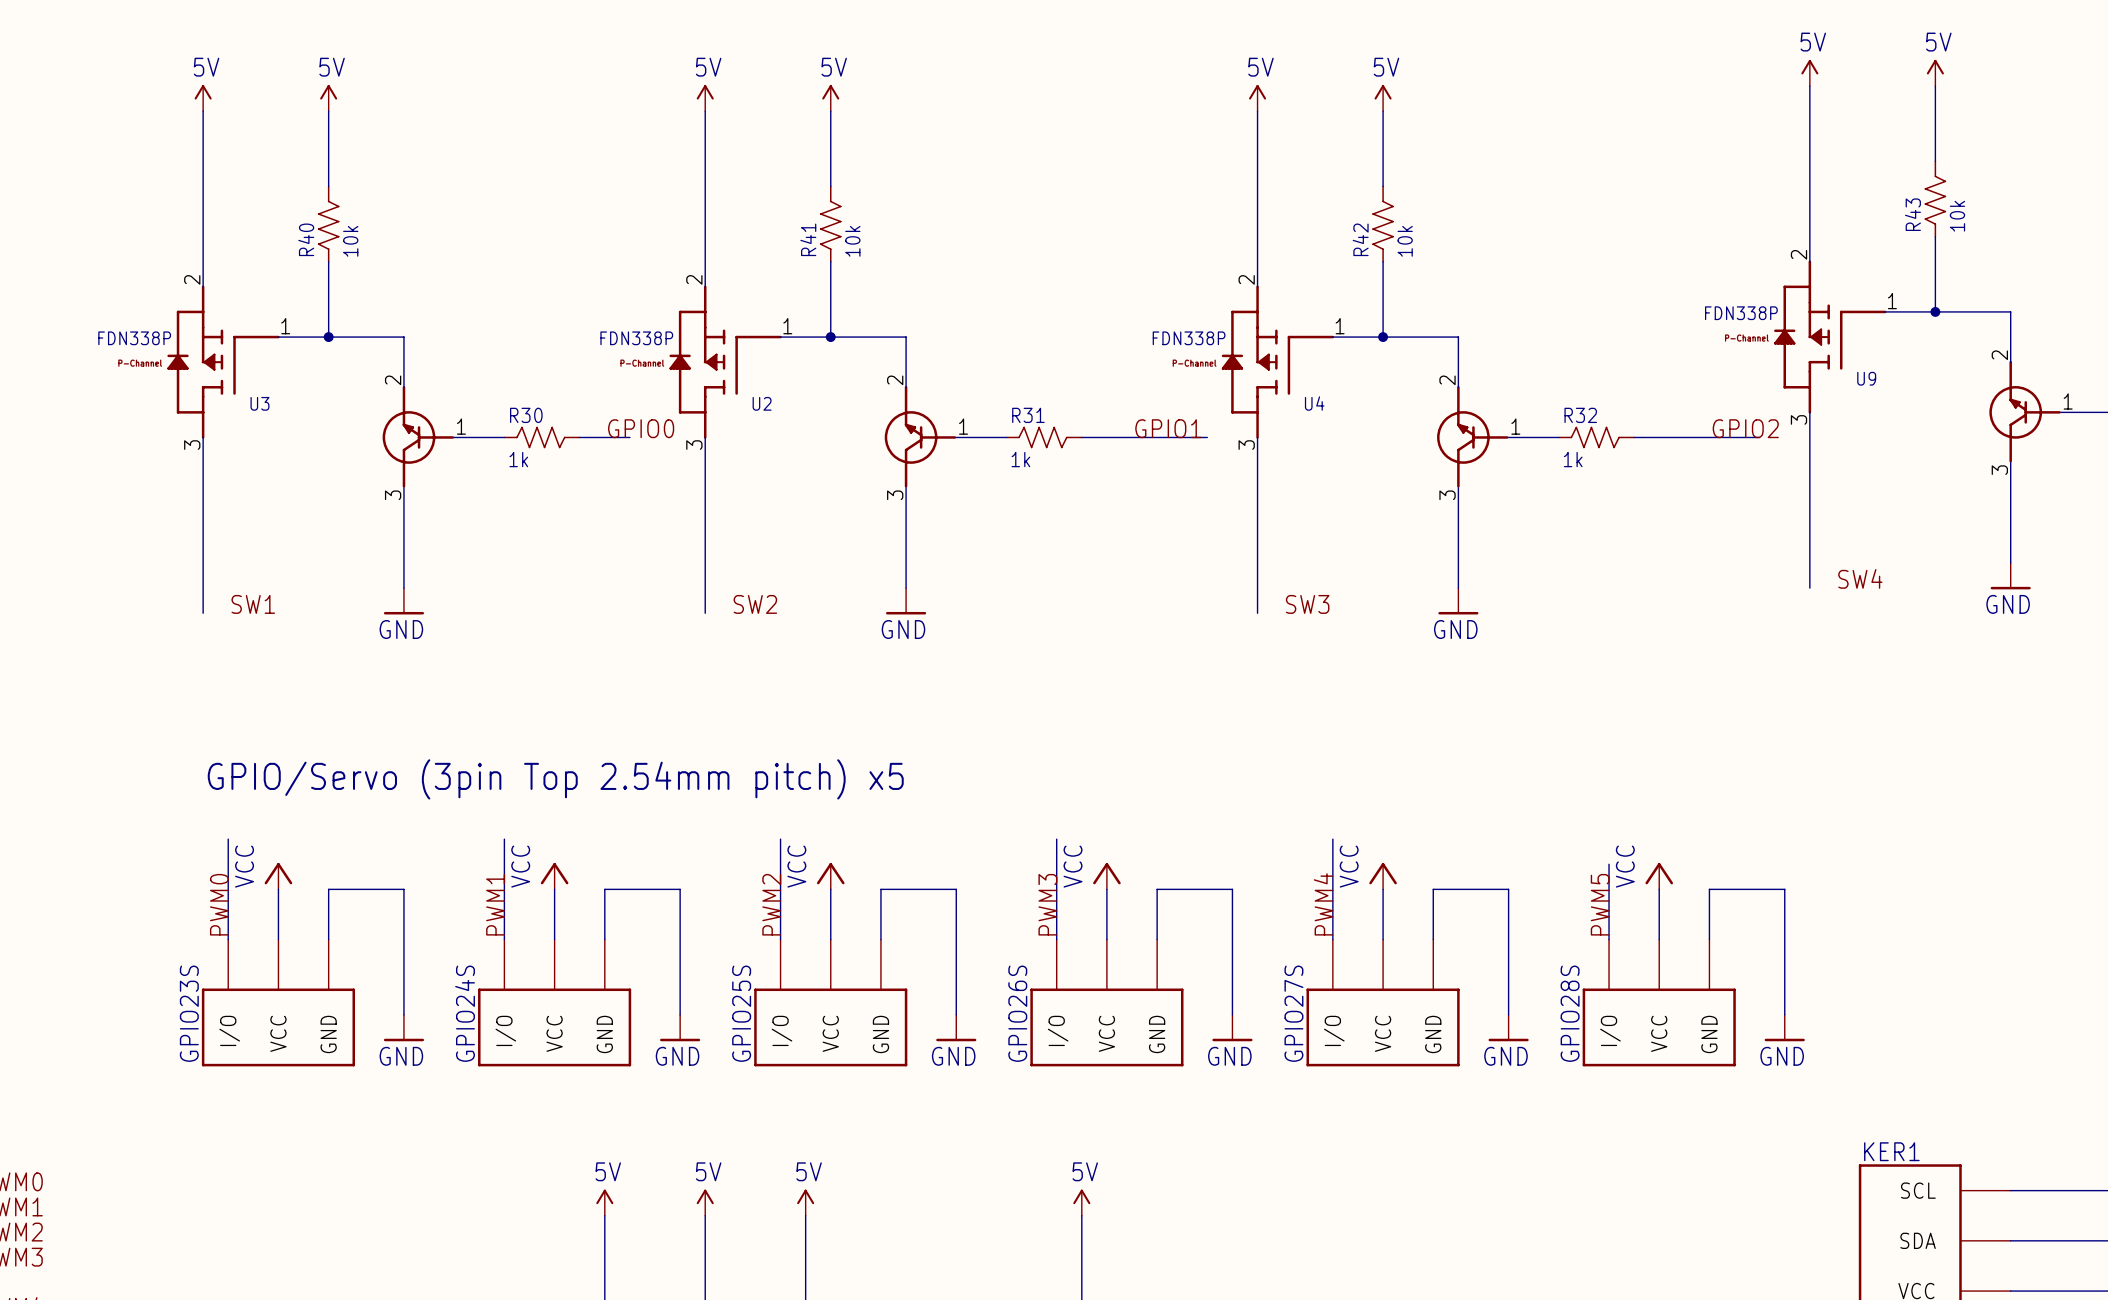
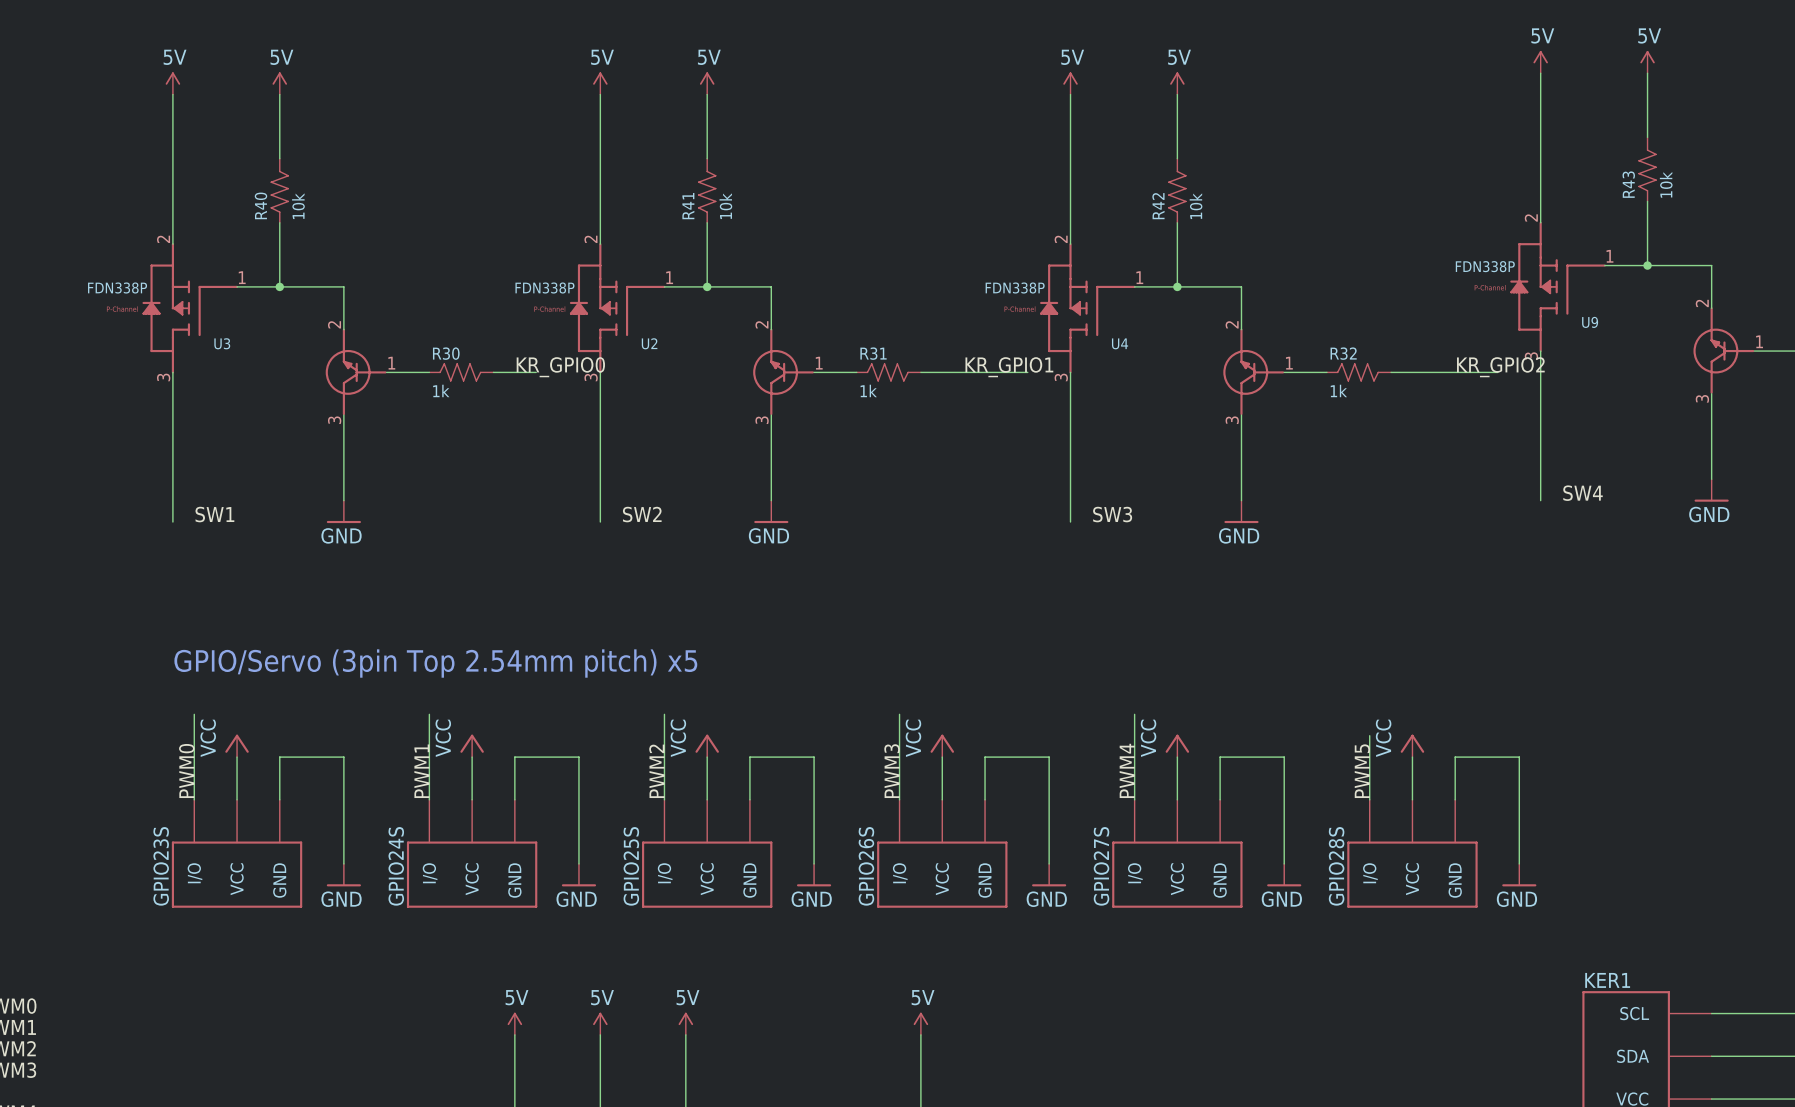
label: GPIO0 (641, 428) -> KR_GPIO0 (560, 367)
label: GPIO1 (1168, 428) -> KR_GPIO1 (1009, 367)
label: GPIO2 (1745, 428) -> KR_GPIO2 (1500, 367)

